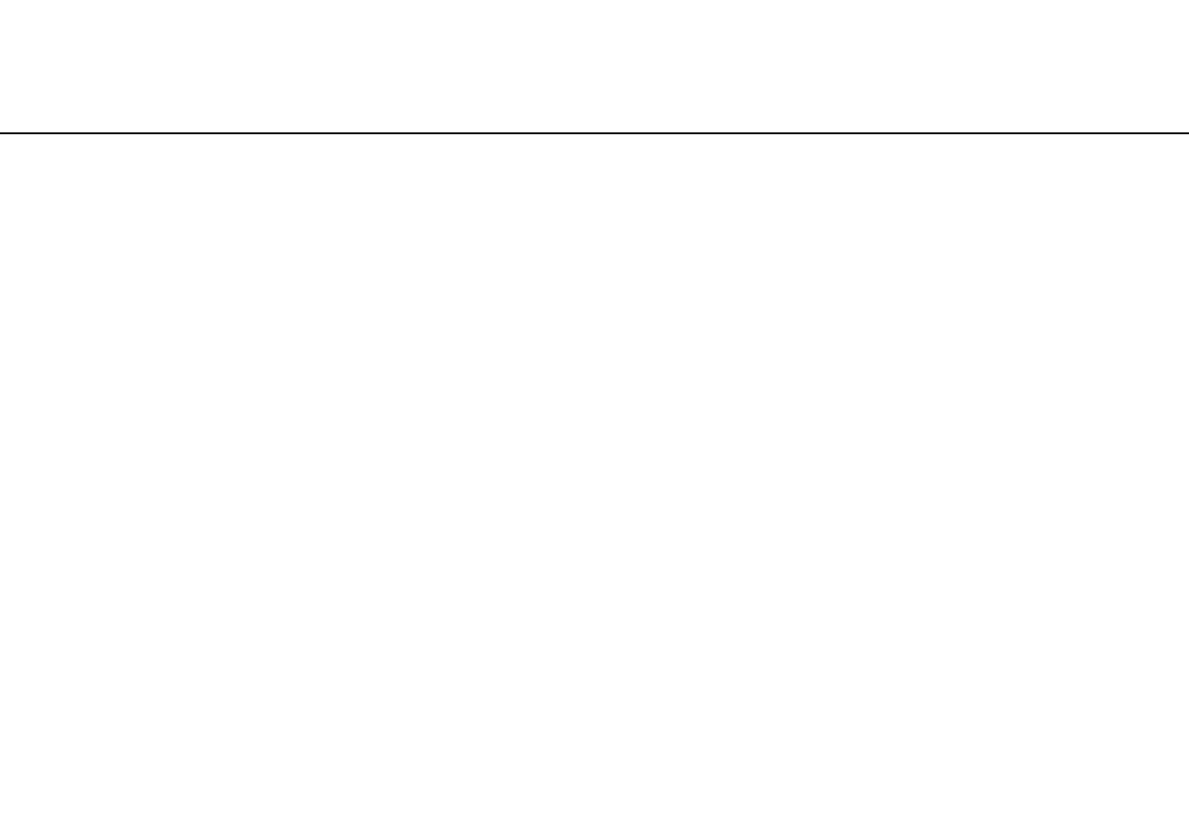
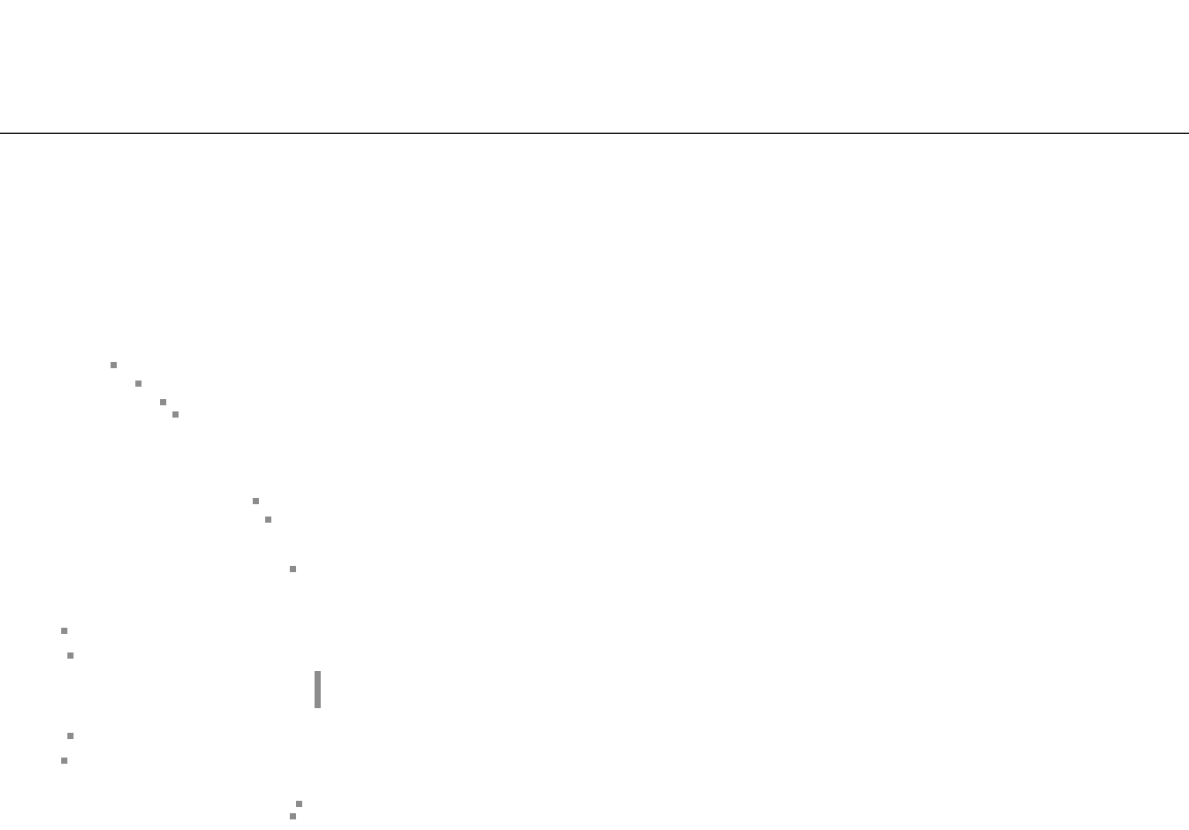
drawing: none -> [110, 361, 179, 418]
drawing: none -> [252, 497, 297, 573]
drawing: none -> [61, 627, 74, 659]
drawing: none -> [314, 671, 321, 709]
drawing: none -> [61, 732, 74, 764]
drawing: none -> [289, 800, 303, 820]

